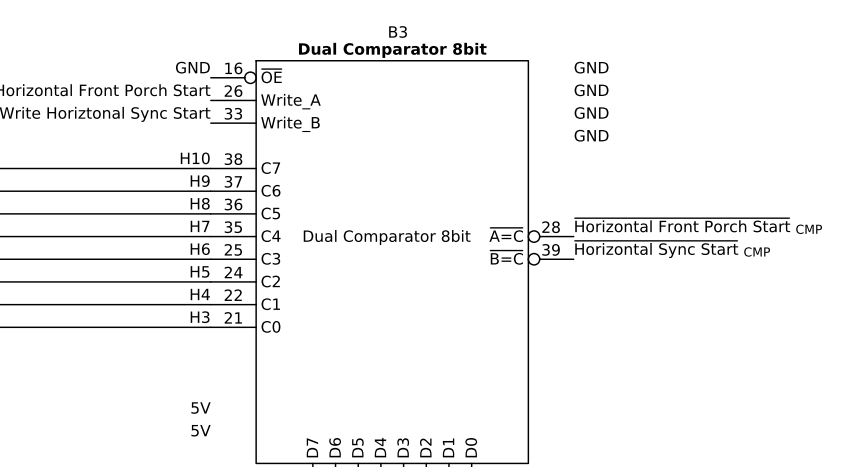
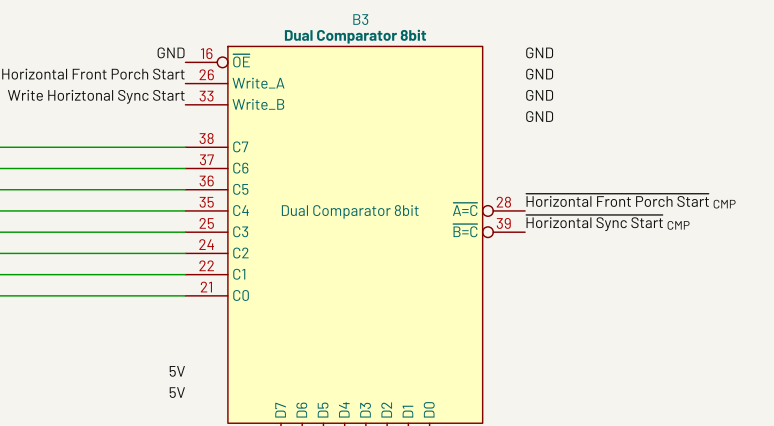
label: H10 (195, 158) -> none
label: H9 (200, 181) -> none
label: H8 (200, 203) -> none
label: H7 (200, 226) -> none
label: H6 (200, 249) -> none
label: H5 (200, 271) -> none
label: H4 (200, 294) -> none
label: H3 (200, 317) -> none

